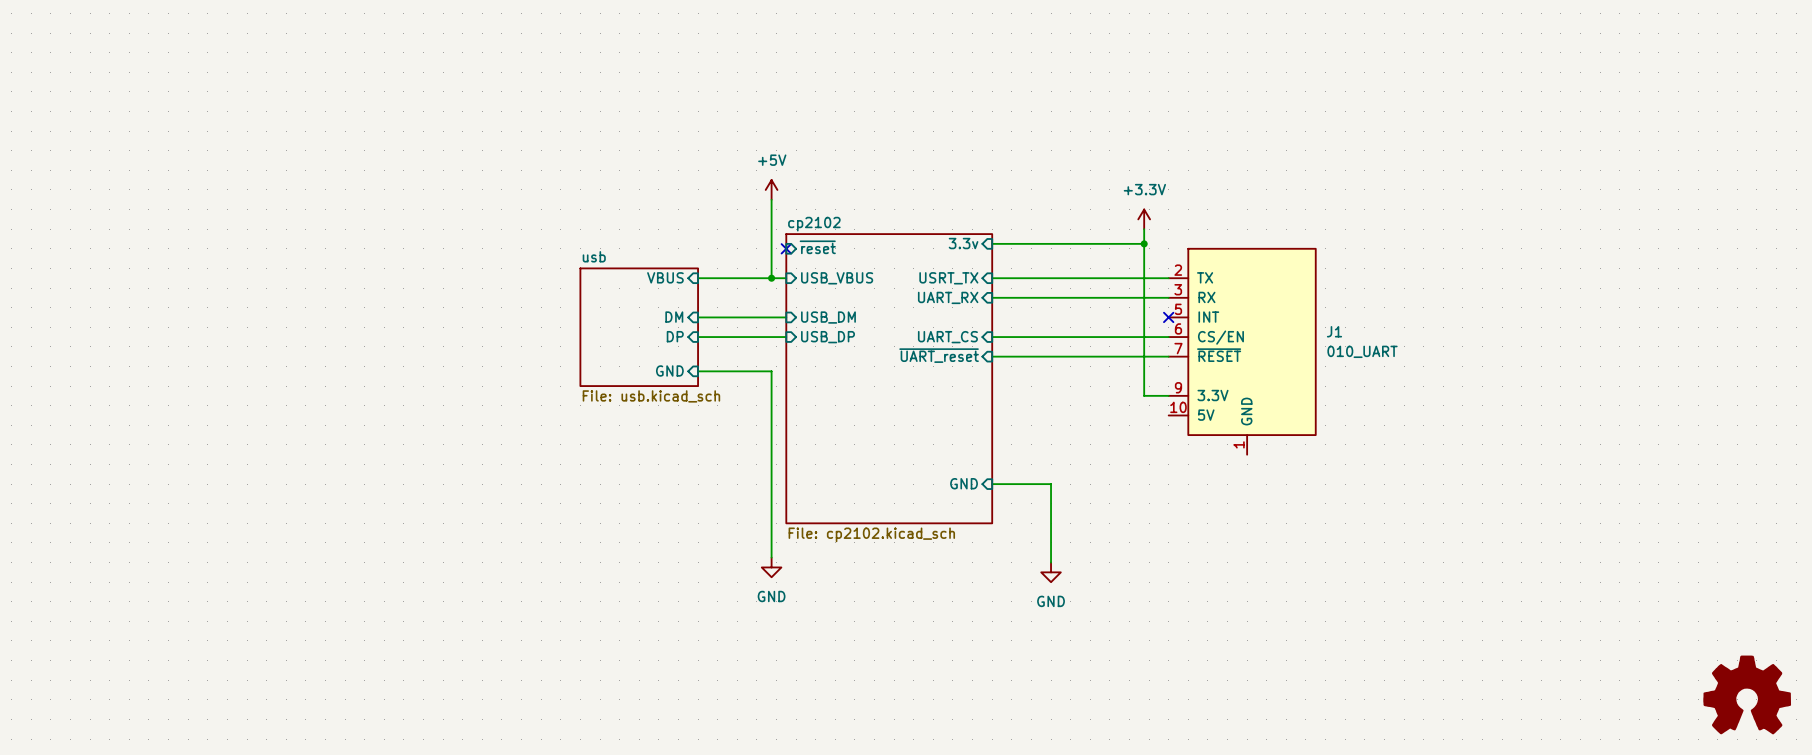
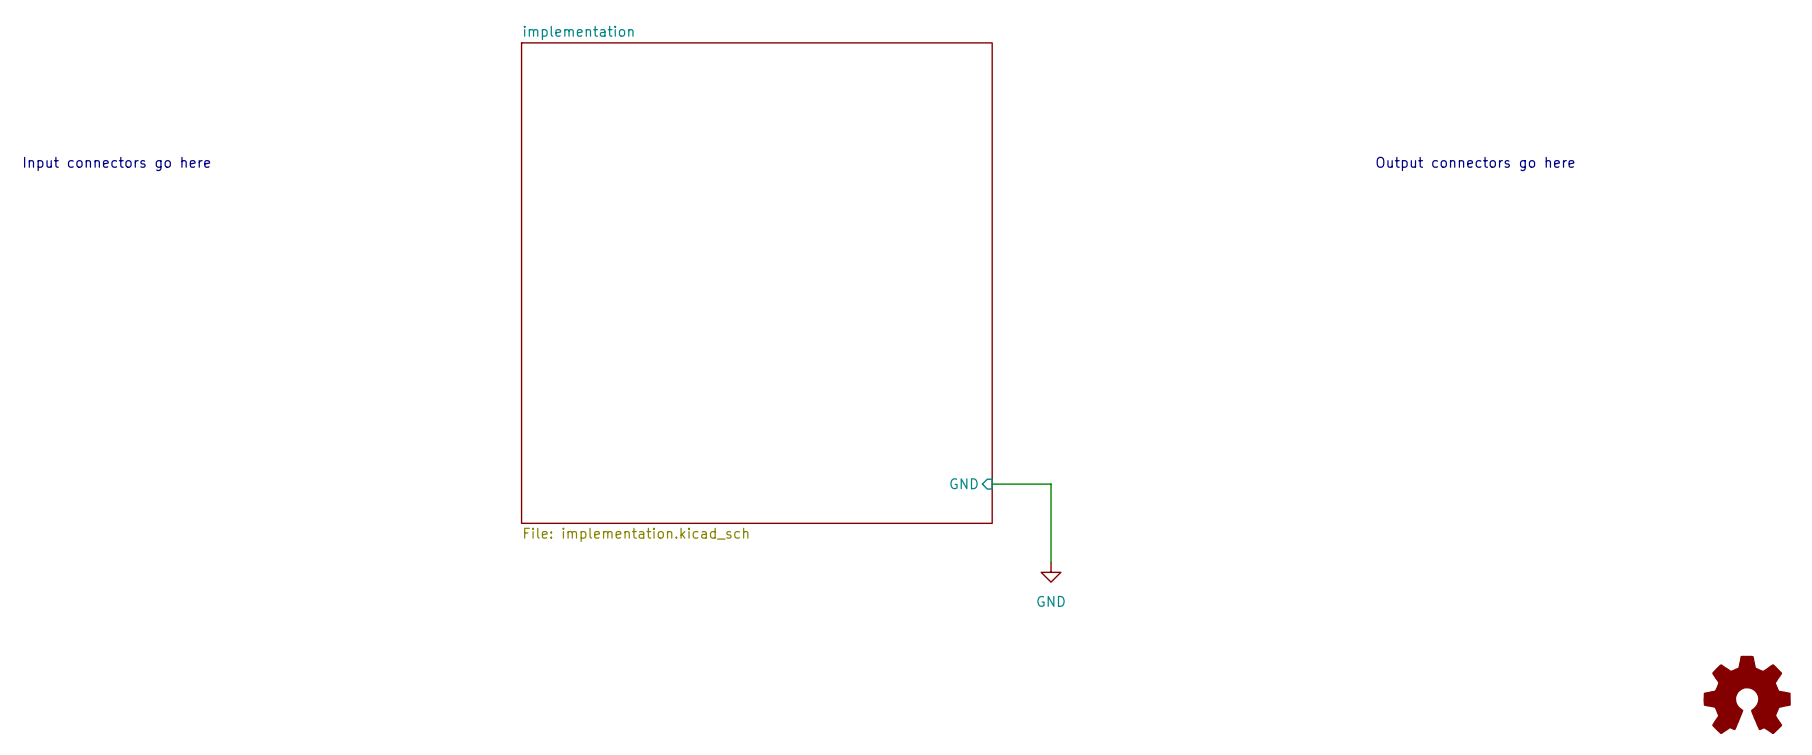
text: none -> Input connectors go here (117, 163)
text: none -> Output connectors go here (1475, 163)
power symbol: +5V (771, 189) -> none
wire: (771, 199) (771, 278) -> none
power symbol: +3.3V (1144, 219) -> none
wire: (1144, 229) (1144, 395) (1168, 395) -> none
sheet pin: 3.3v (963, 243) -> none
wire: (992, 243) (1144, 243) -> none
junction: (1144, 243) -> none
sheet pin: ~{reset} (817, 247) -> none
no-connect mark: (786, 248) -> none
sheet pin: VBUS (665, 277) -> none
wire: (698, 278) (786, 278) -> none
junction: (771, 278) -> none
sheet pin: USB_VBUS (837, 278) -> none
sheet pin: USRT_TX (948, 278) -> none
wire: (992, 278) (1168, 278) -> none
sheet implementation: none -> File: implementation.kicad_sch (756, 283)
sheet pin: UART_RX (948, 297) -> none
wire: (992, 297) (1168, 297) -> none
sheet pin: DM (674, 317) -> none
wire: (698, 317) (786, 317) -> none
sheet pin: USB_DM (828, 317) -> none
no-connect mark: (1168, 317) -> none
sheet usb: File: usb.kicad_sch (639, 327) -> none
sheet pin: DP (675, 336) -> none
wire: (698, 337) (786, 337) -> none
sheet pin: USB_DP (828, 337) -> none
sheet pin: UART_CS (947, 337) -> none
wire: (992, 337) (1168, 337) -> none
J1: 010_UART (1242, 351) -> none
sheet pin: ~{UART_reset} (939, 355) -> none
wire: (992, 356) (1168, 356) -> none
sheet pin: GND (669, 370) -> none
wire: (698, 371) (771, 371) (771, 557) -> none
sheet cp2102: File: cp2102.kicad_sch (889, 378) -> none
power symbol: GND (771, 567) -> none

